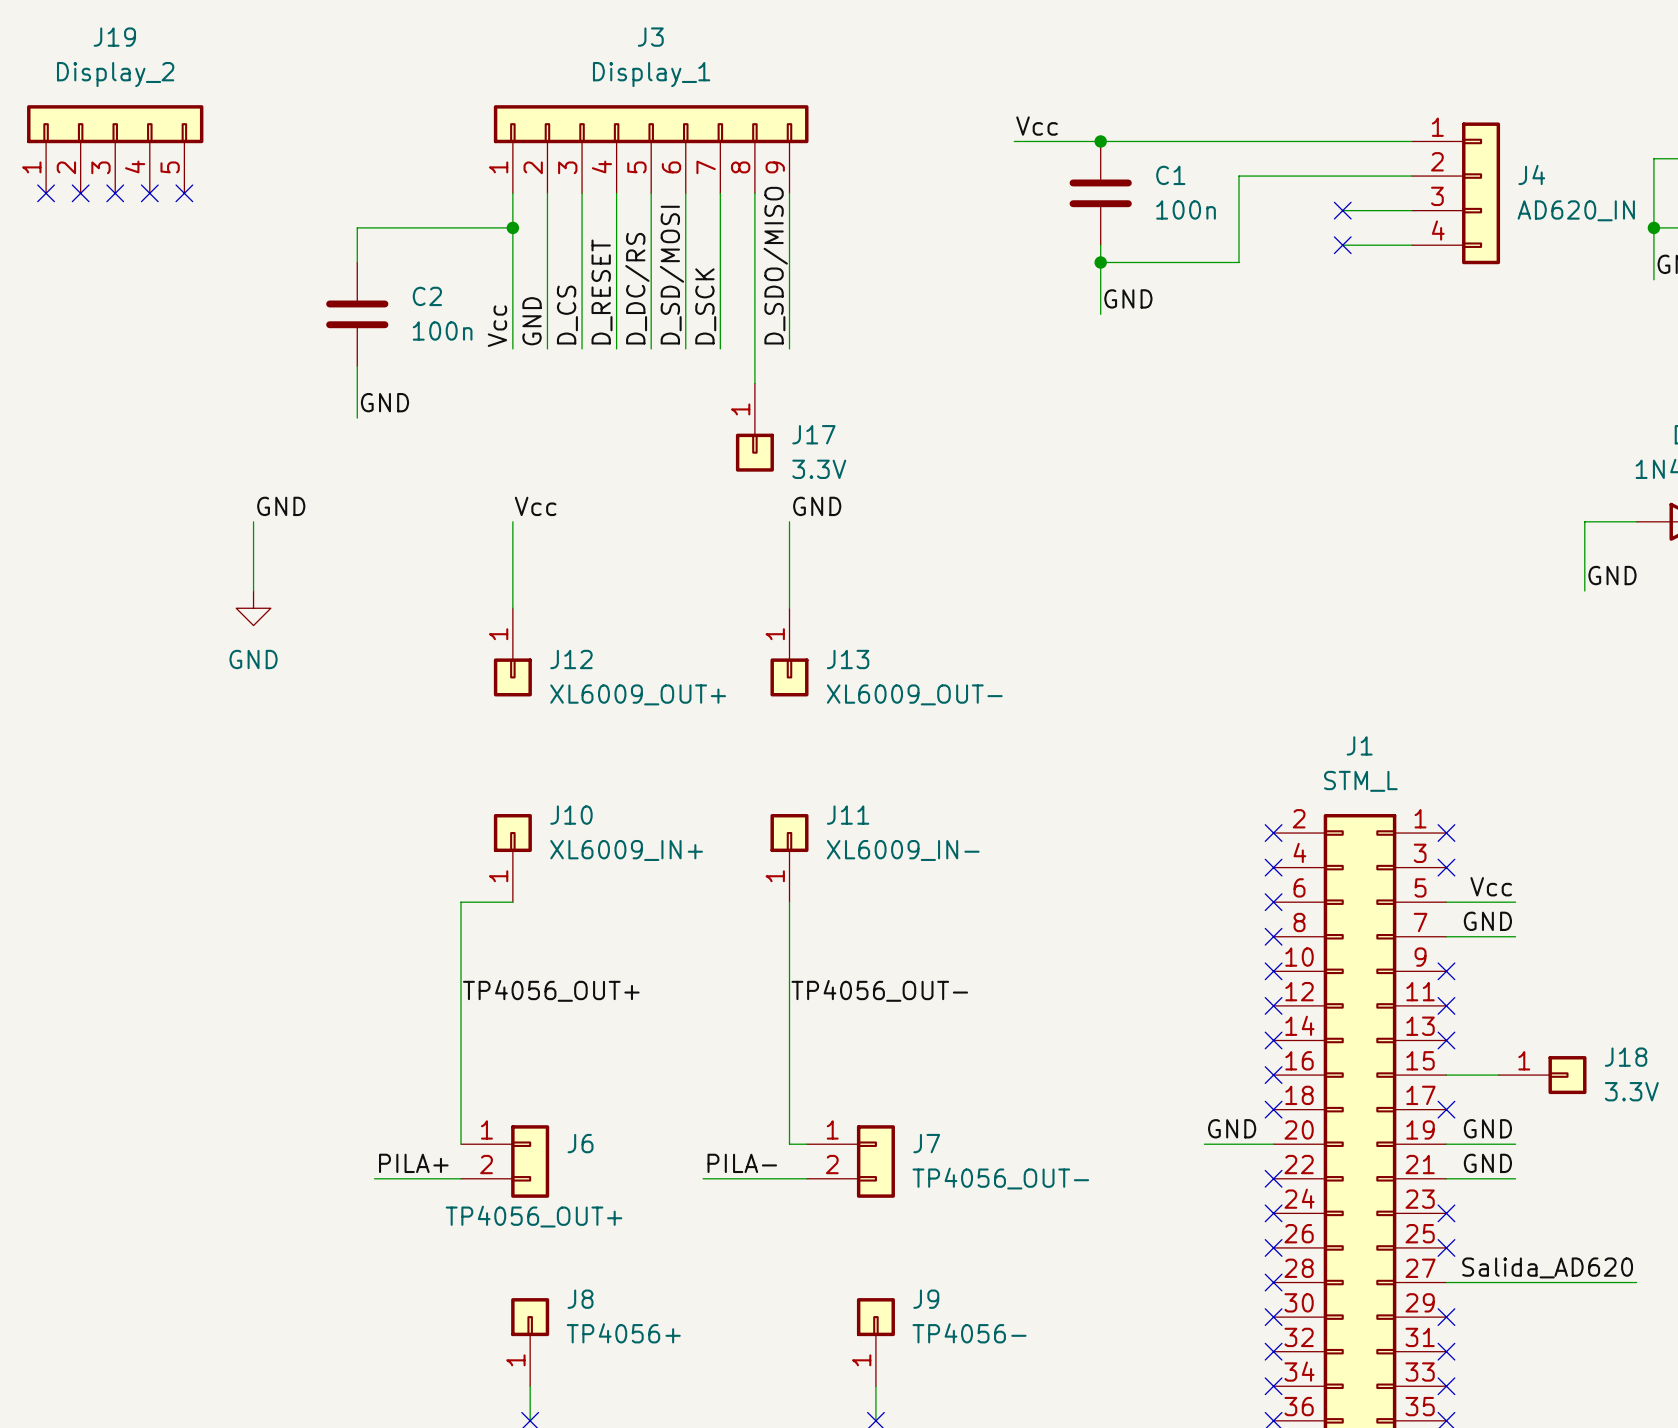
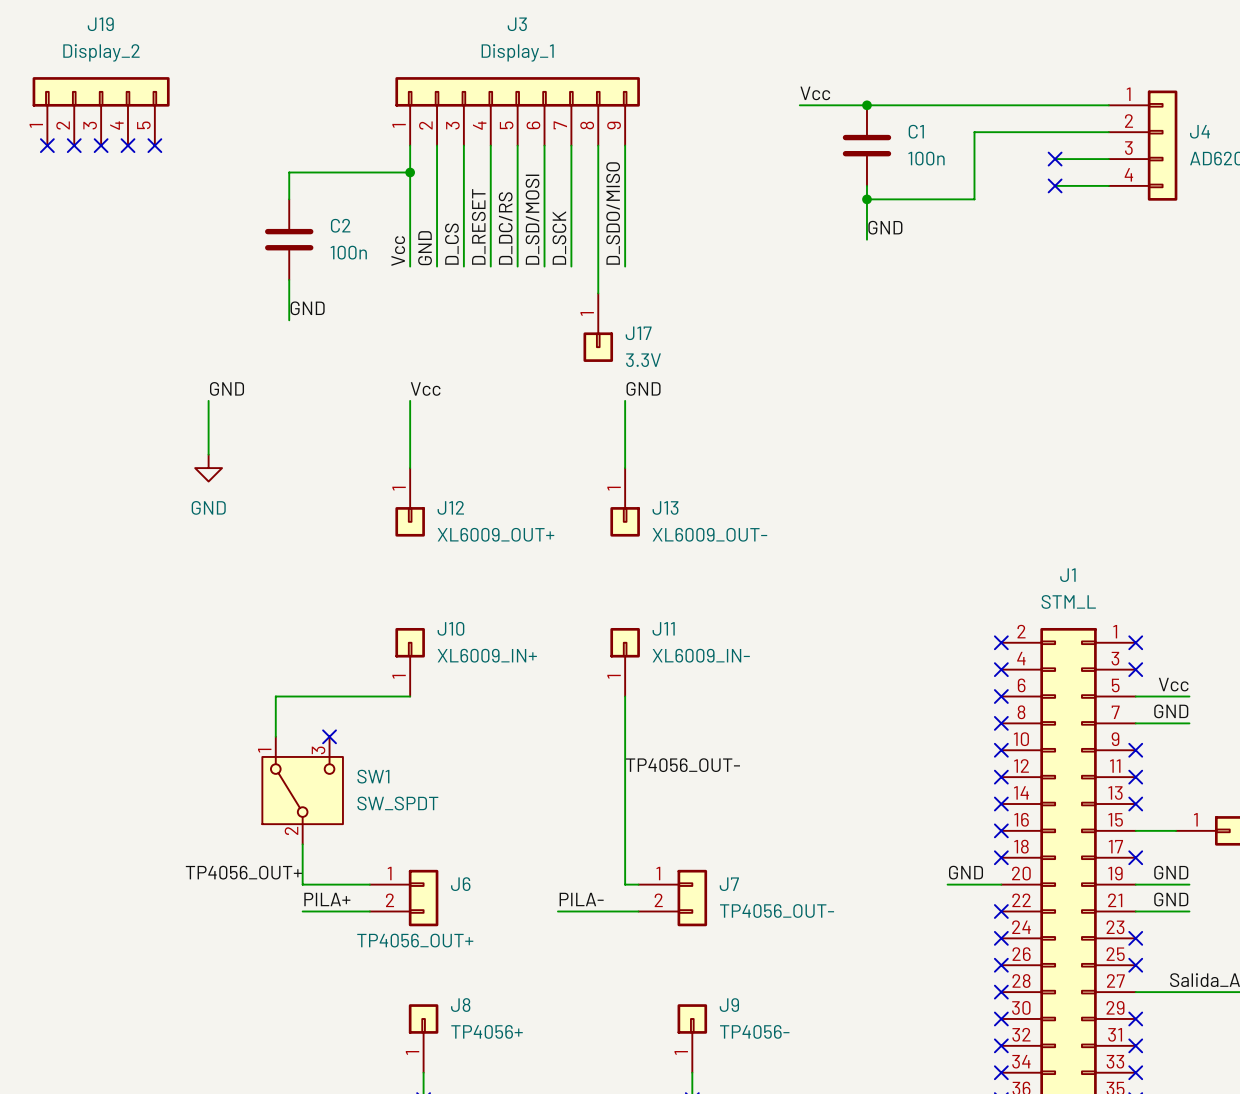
wire: (461, 902) (461, 1144) -> (302, 844) (302, 884) (369, 884)
wire: none -> (369, 696) (275, 696) (275, 736)
no-connect mark: none -> (329, 736)
label position: TP4056_OUT+ (551, 990) -> TP4056_OUT+ (243, 872)
SW1: none -> SW_SPDT (302, 790)

